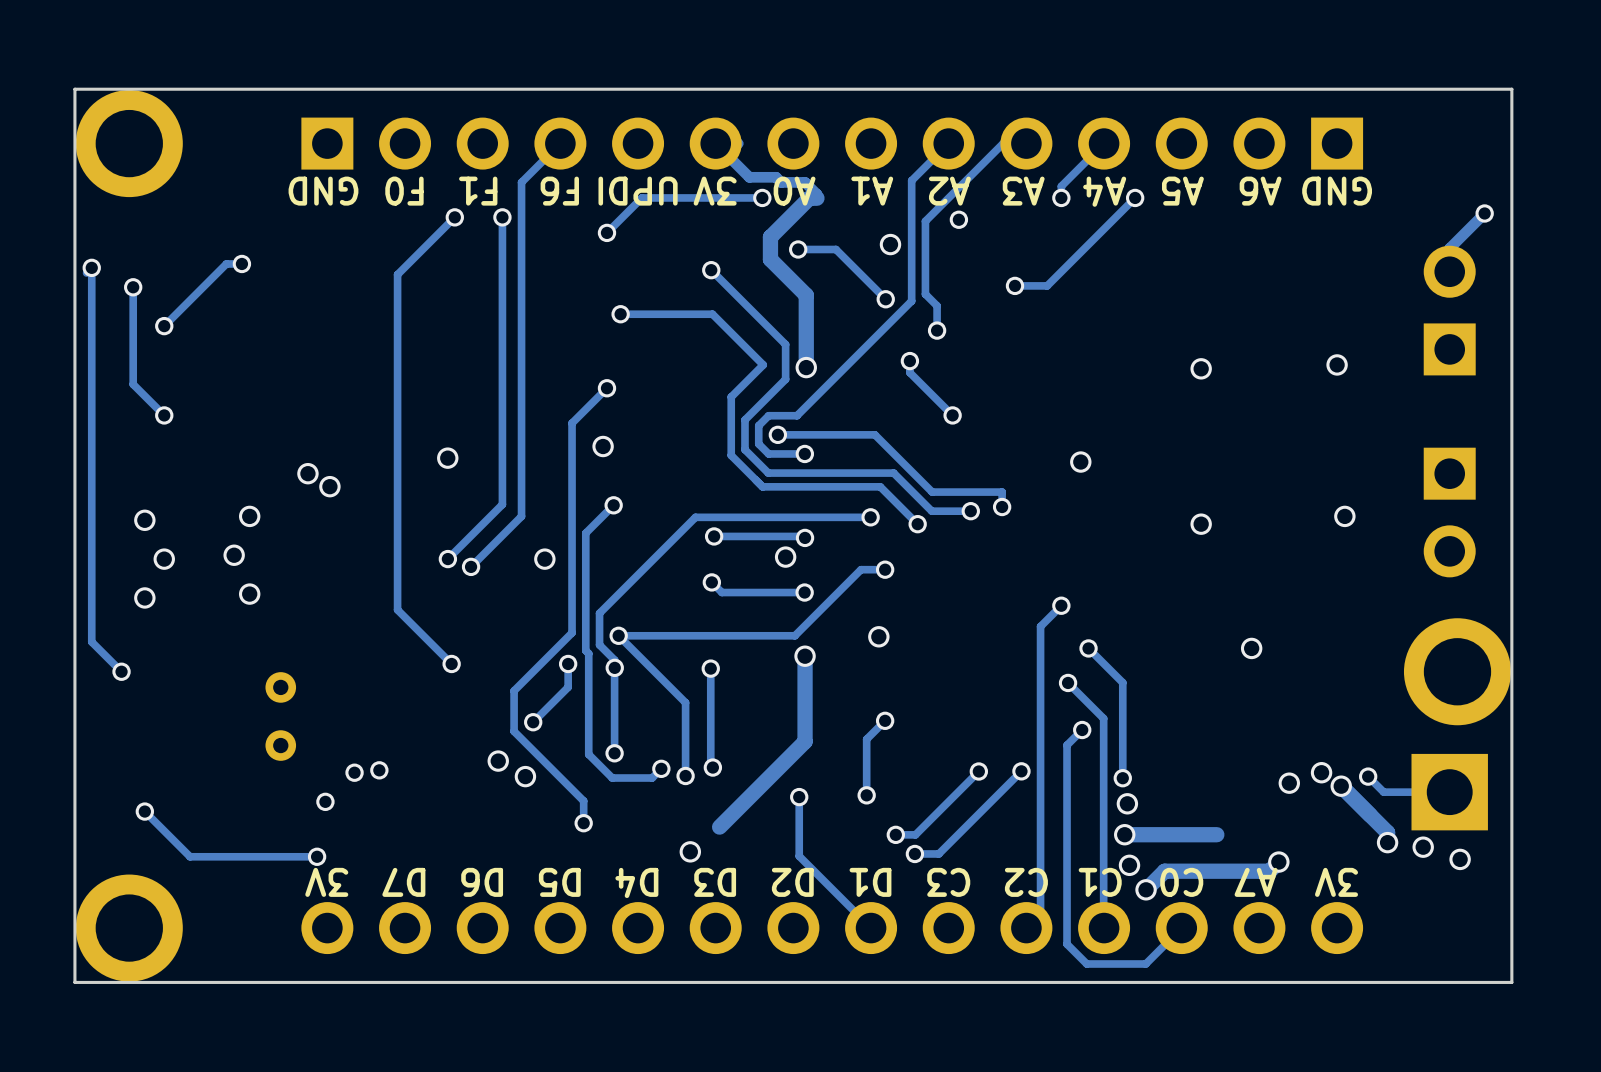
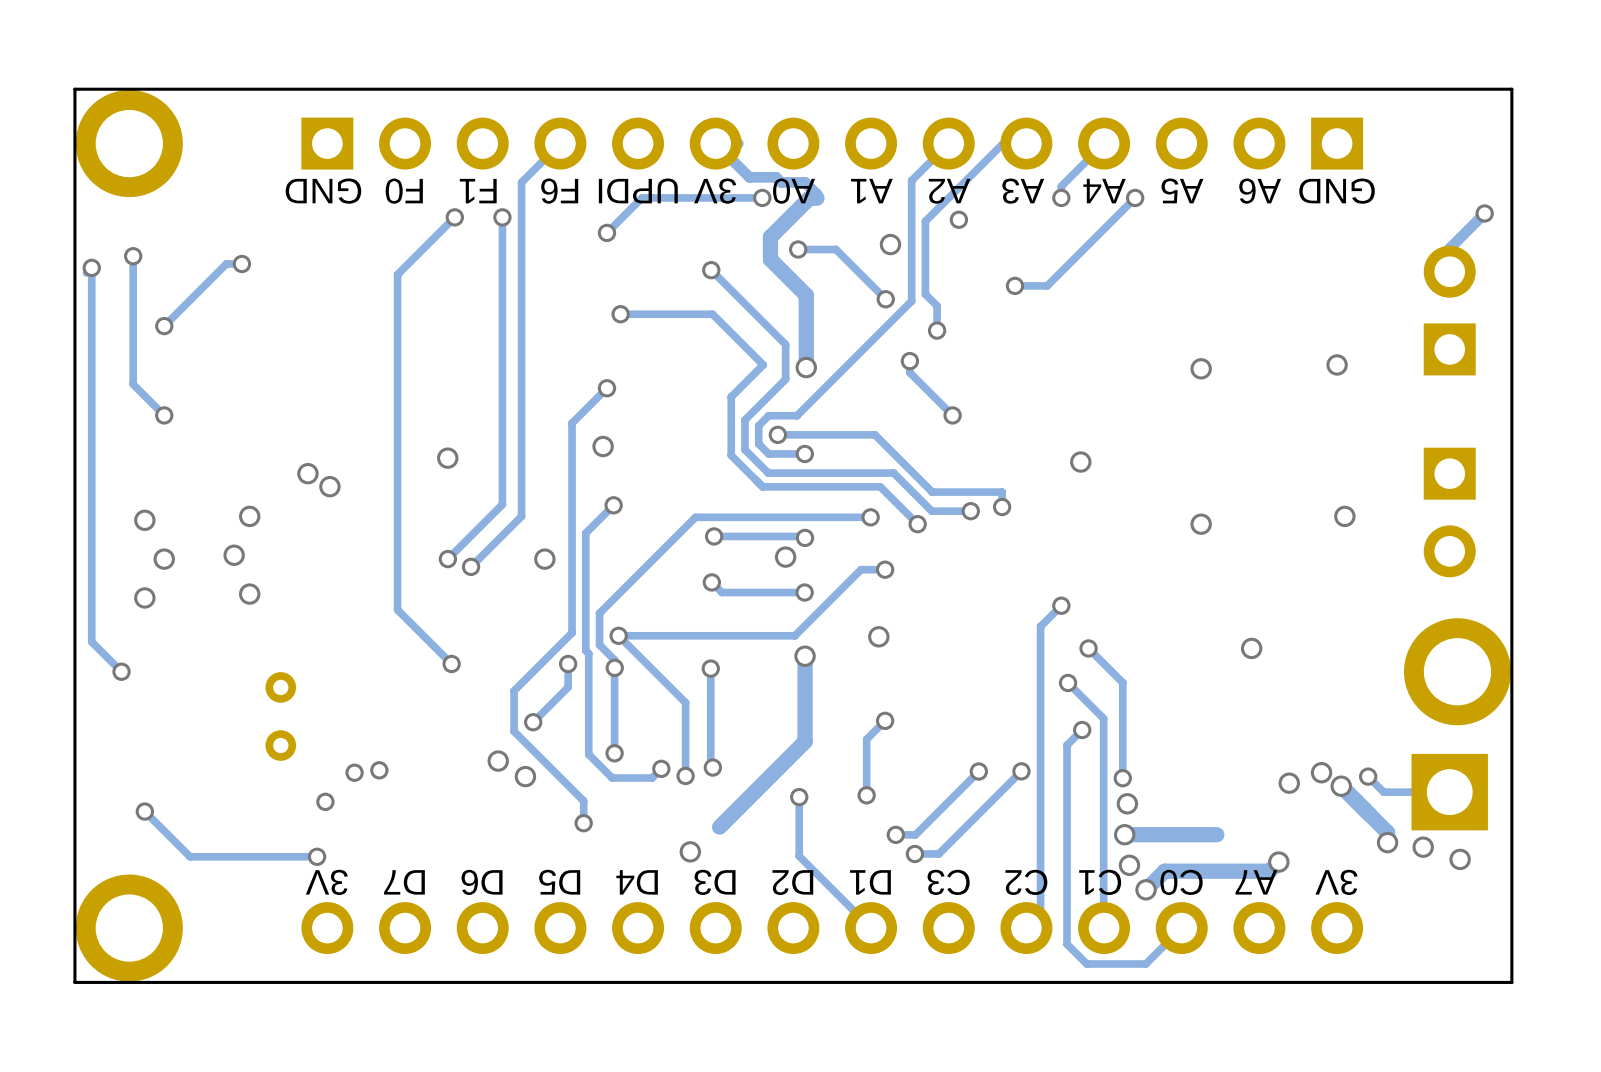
track: none -> (133, 256) (133, 287)
via position: (133, 287) -> (133, 256)

